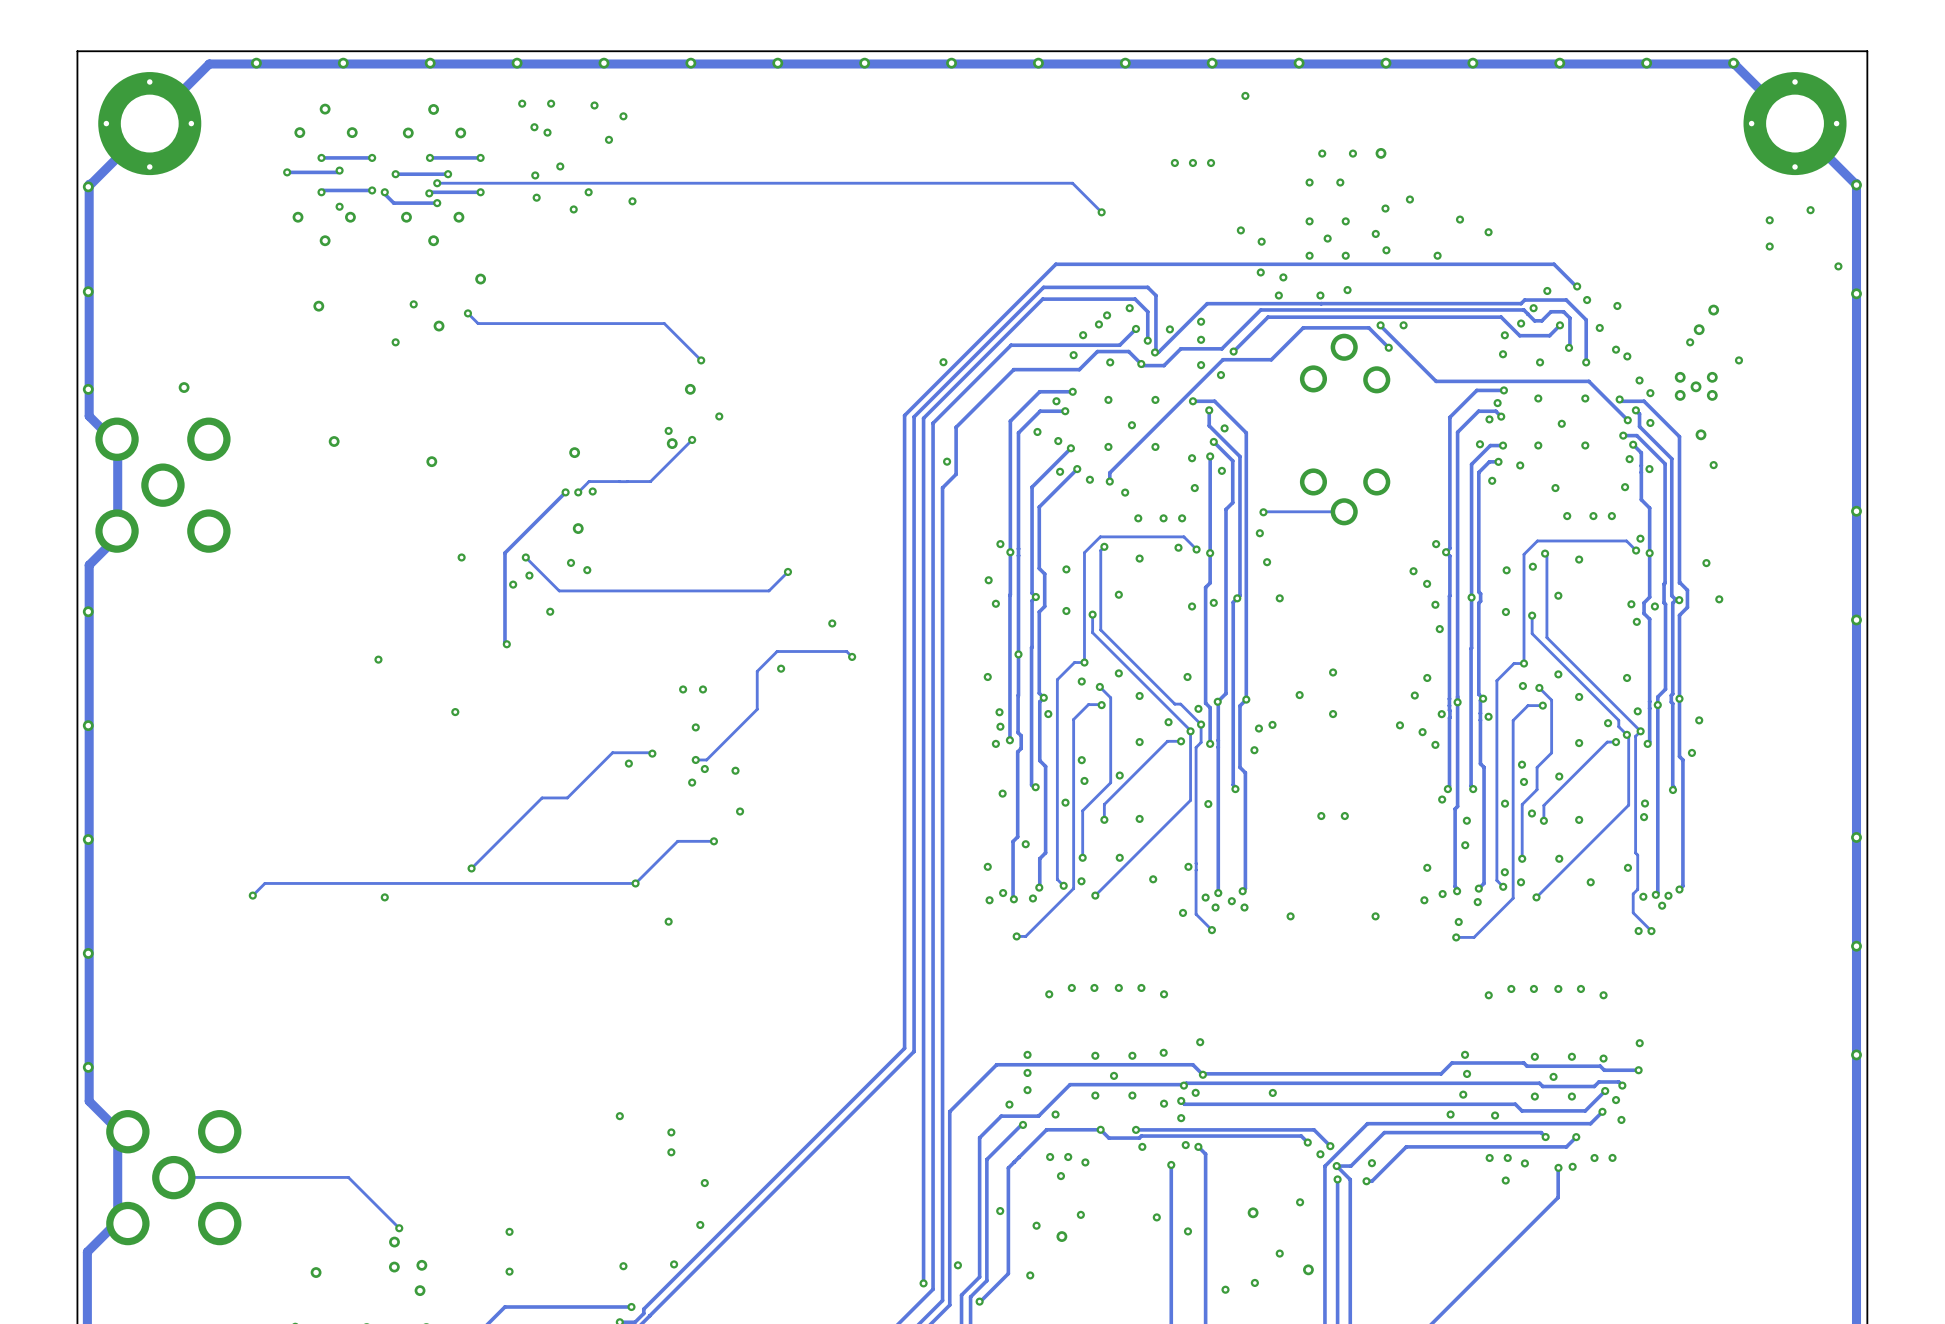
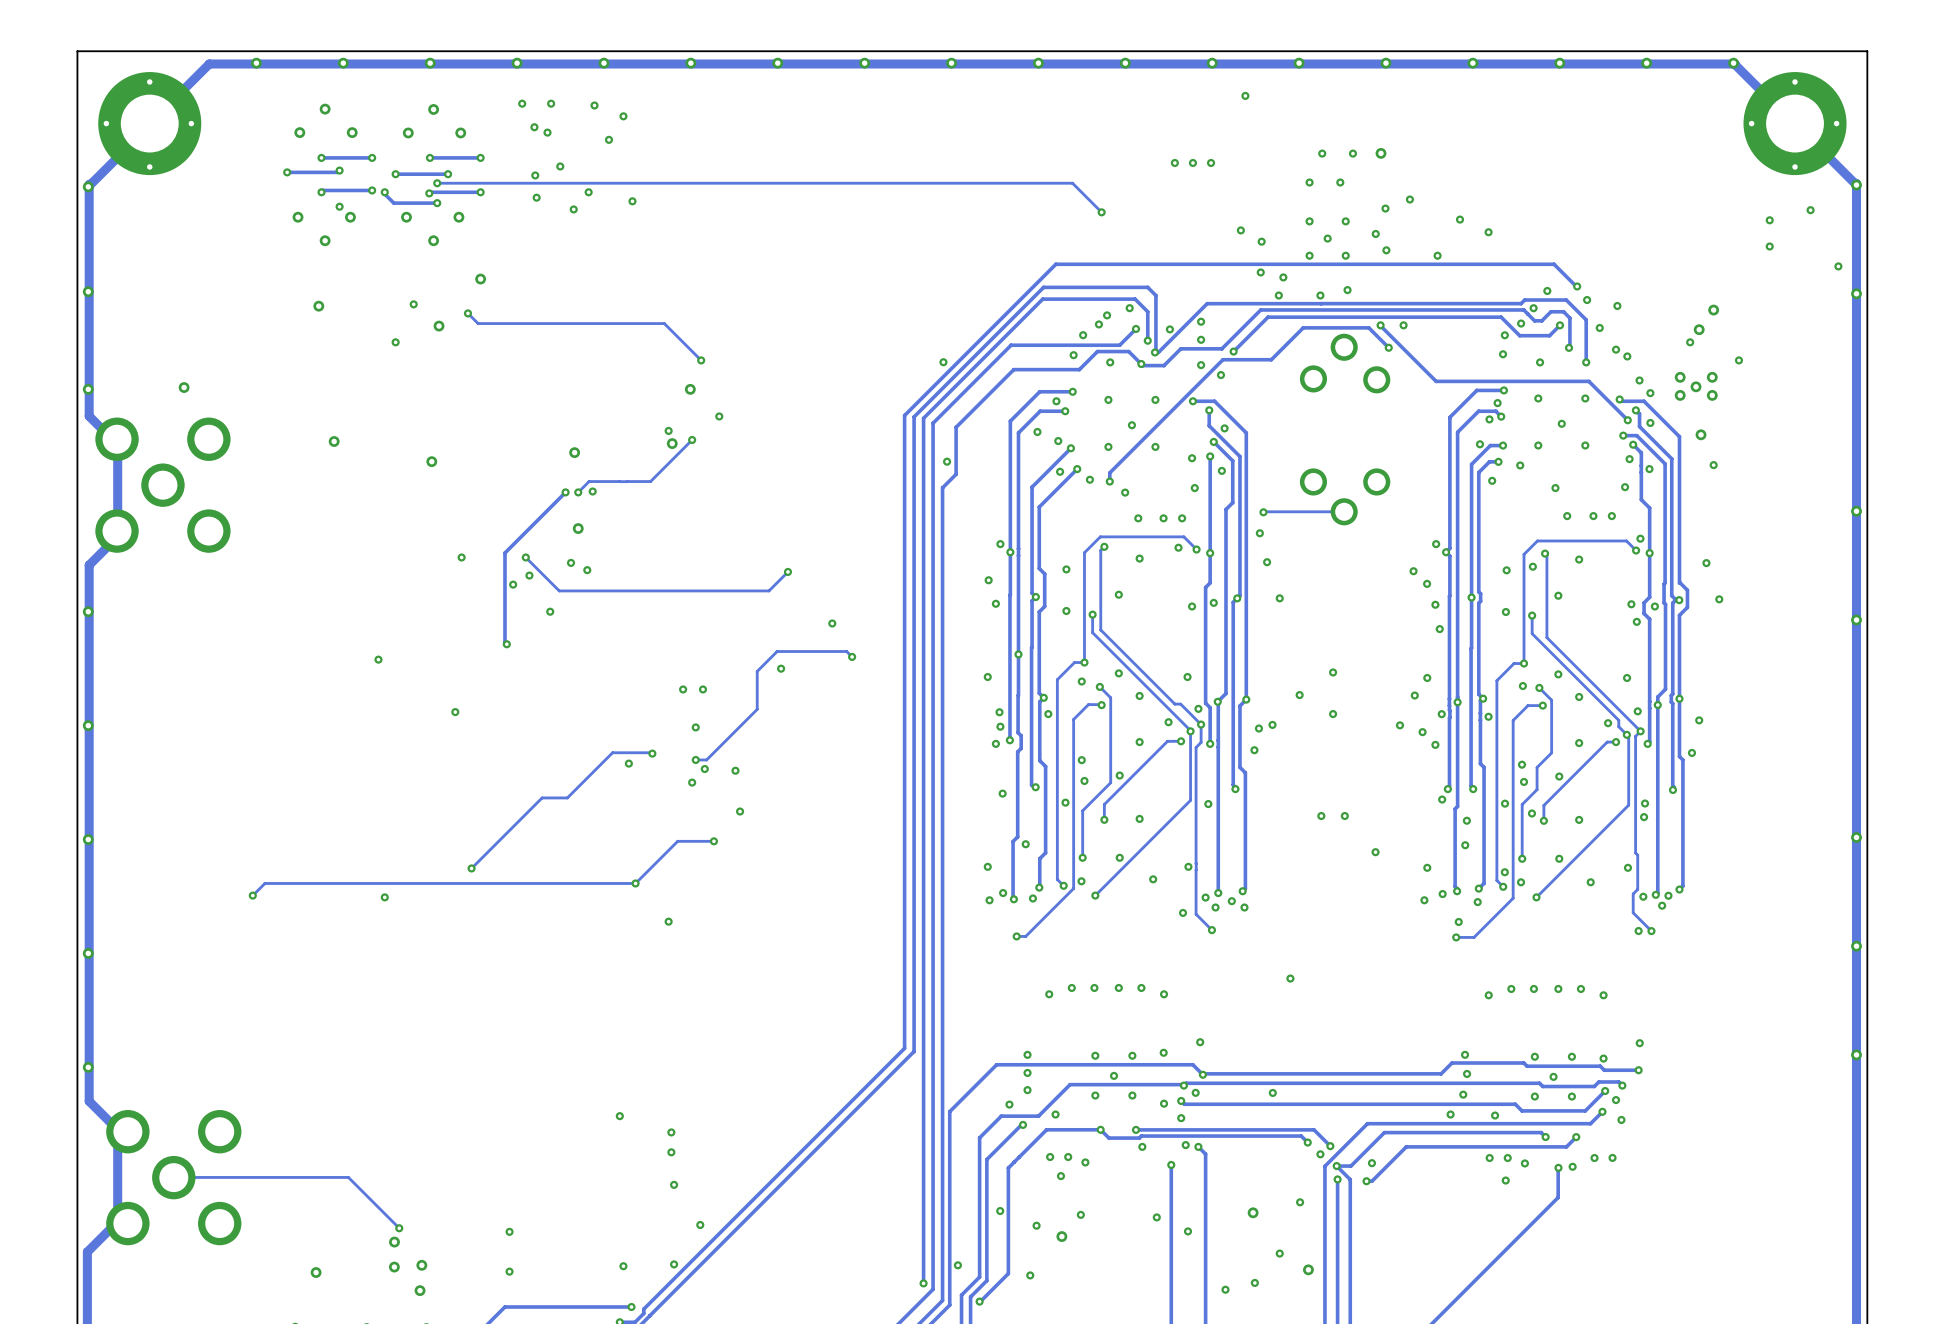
via: none -> (1375, 852)
via: (1290, 916) -> none
via: (1375, 916) -> none
via: none -> (1290, 978)
via position: (704, 1183) -> (674, 1184)

